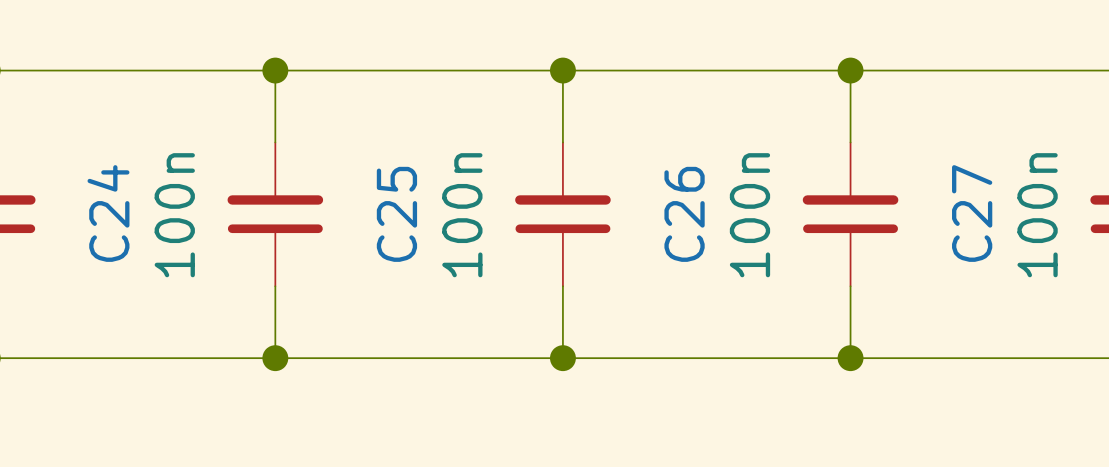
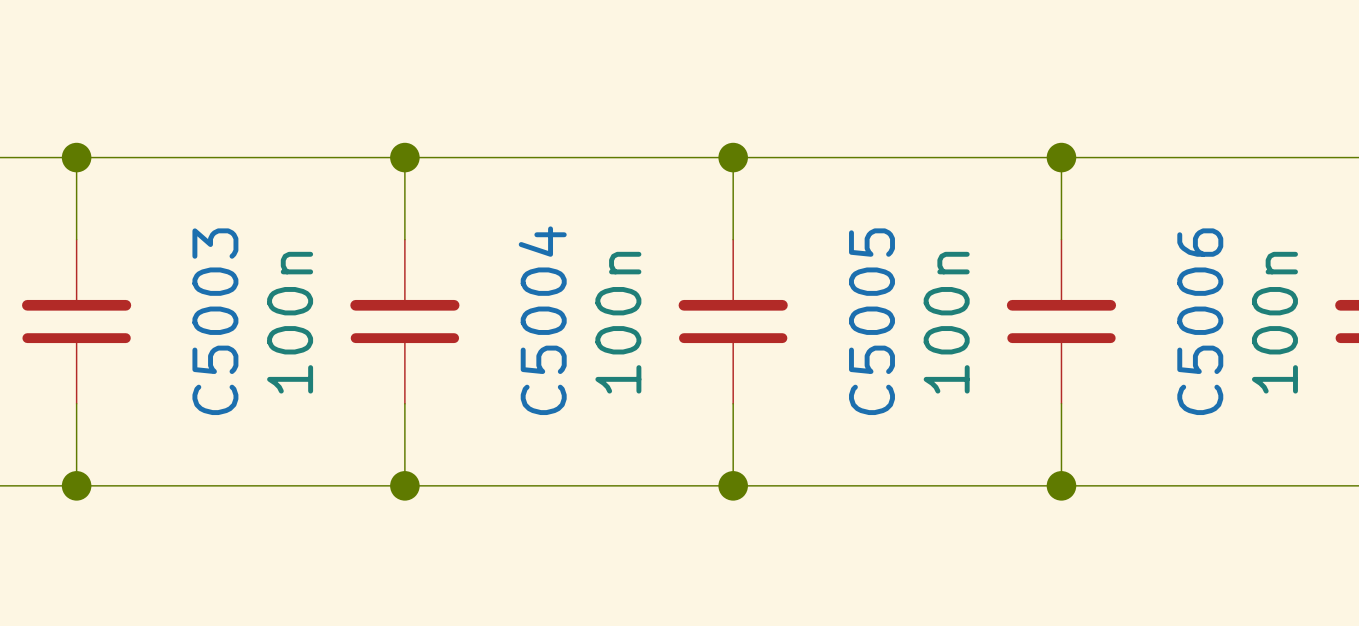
C24 name: C24 (108, 213) -> C5003 (215, 321)
C27 name: C27 (972, 213) -> C5006 (1200, 321)
C25 name: C25 (396, 214) -> C5004 (542, 320)
C26 name: C26 (684, 214) -> C5005 (871, 321)

